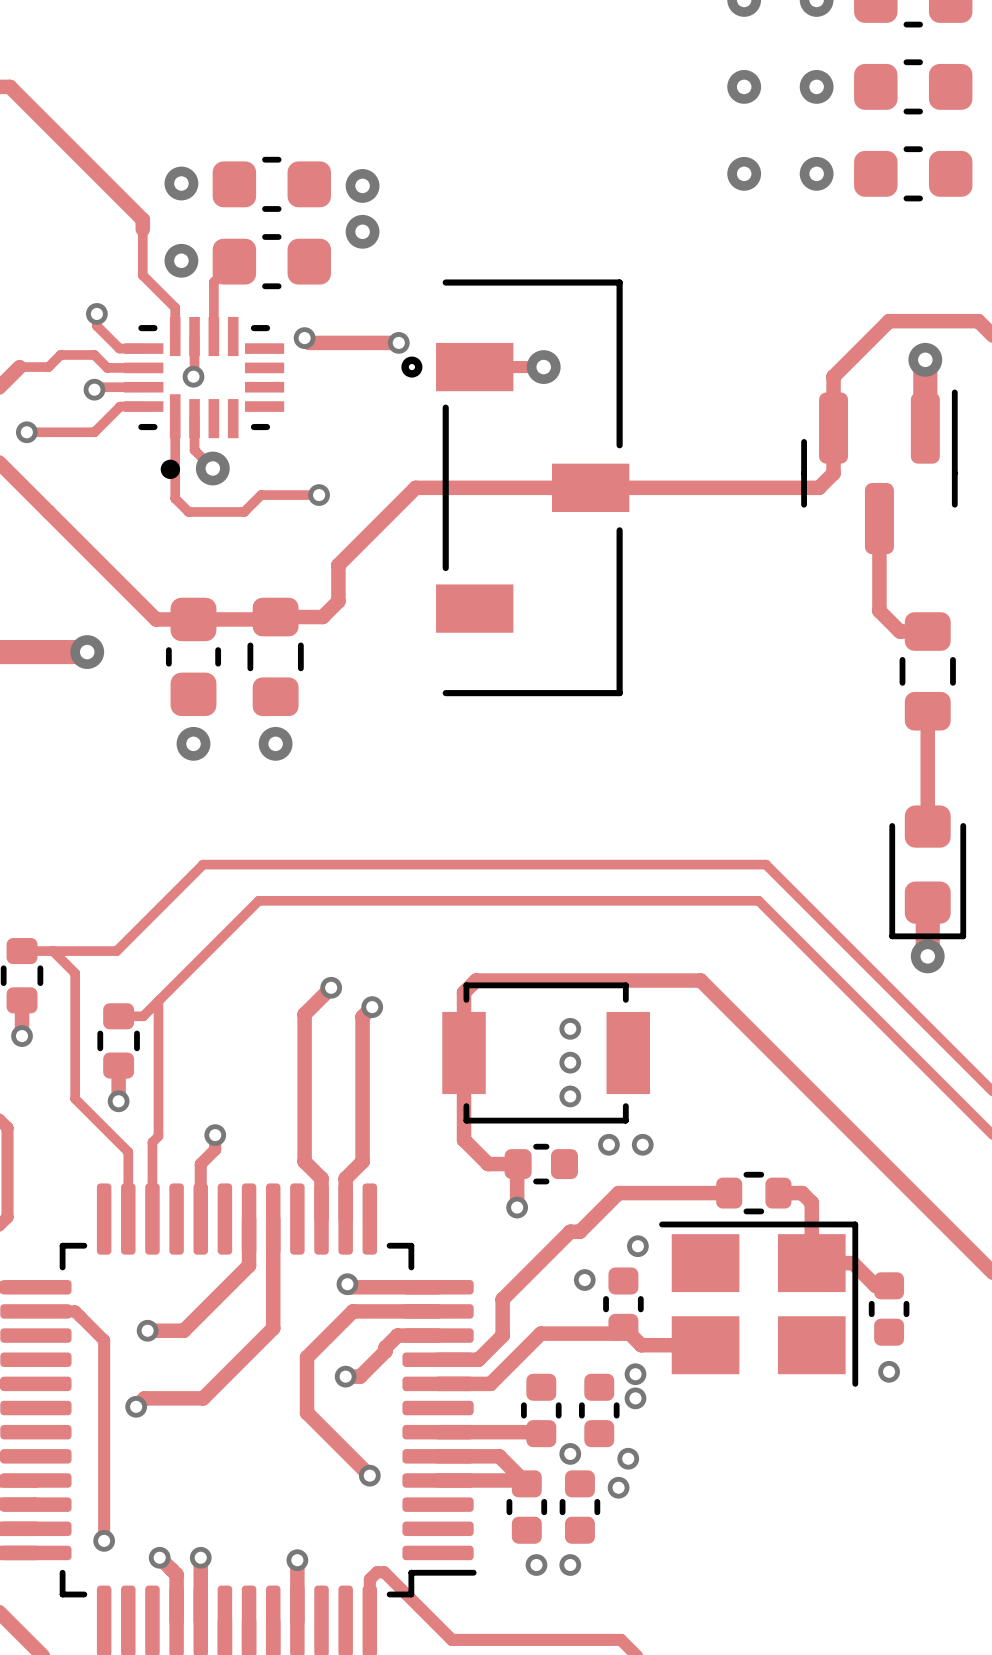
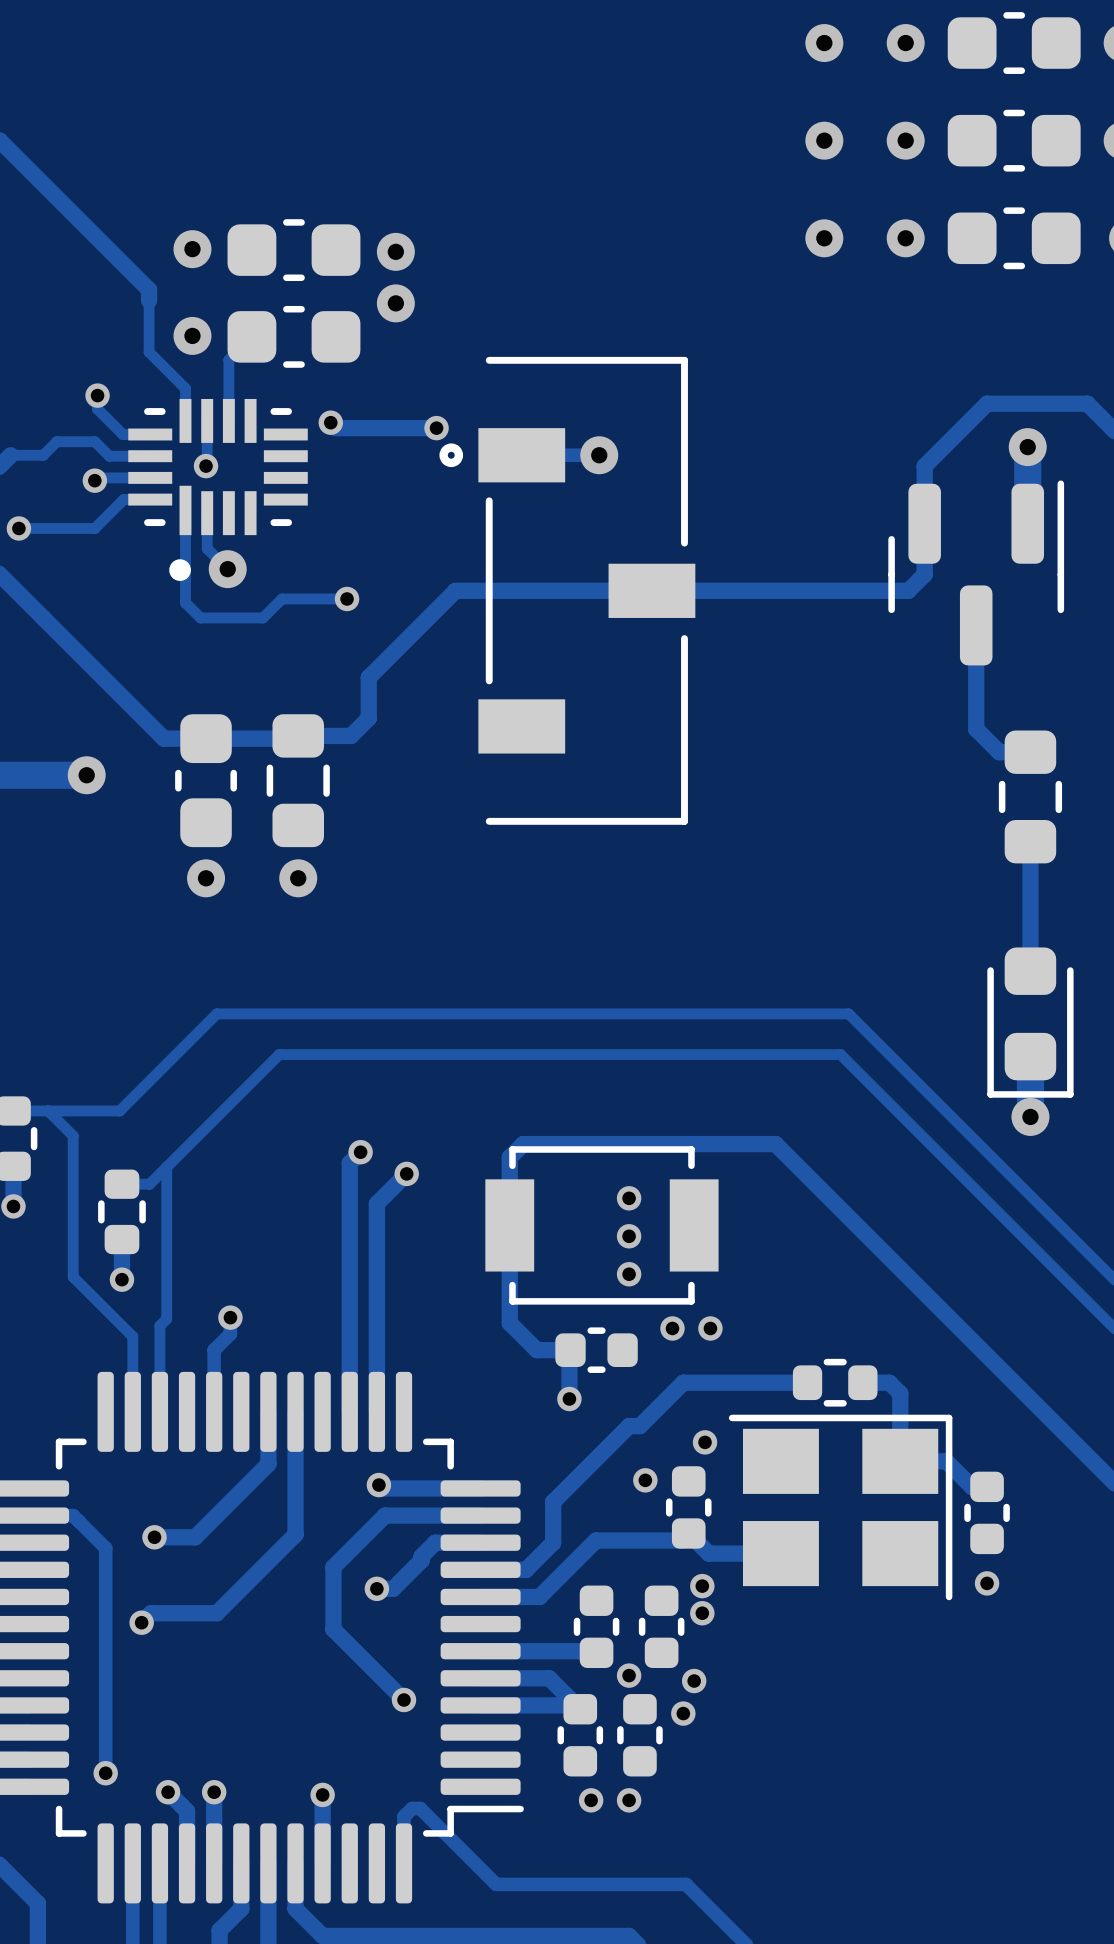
track: (321, 997) (304, 1014) (304, 1161) (321, 1178) -> (349, 1163) (349, 1366)
track: (362, 1016) (362, 1161) (345, 1178) -> (395, 1184) (376, 1203) (376, 1366)

